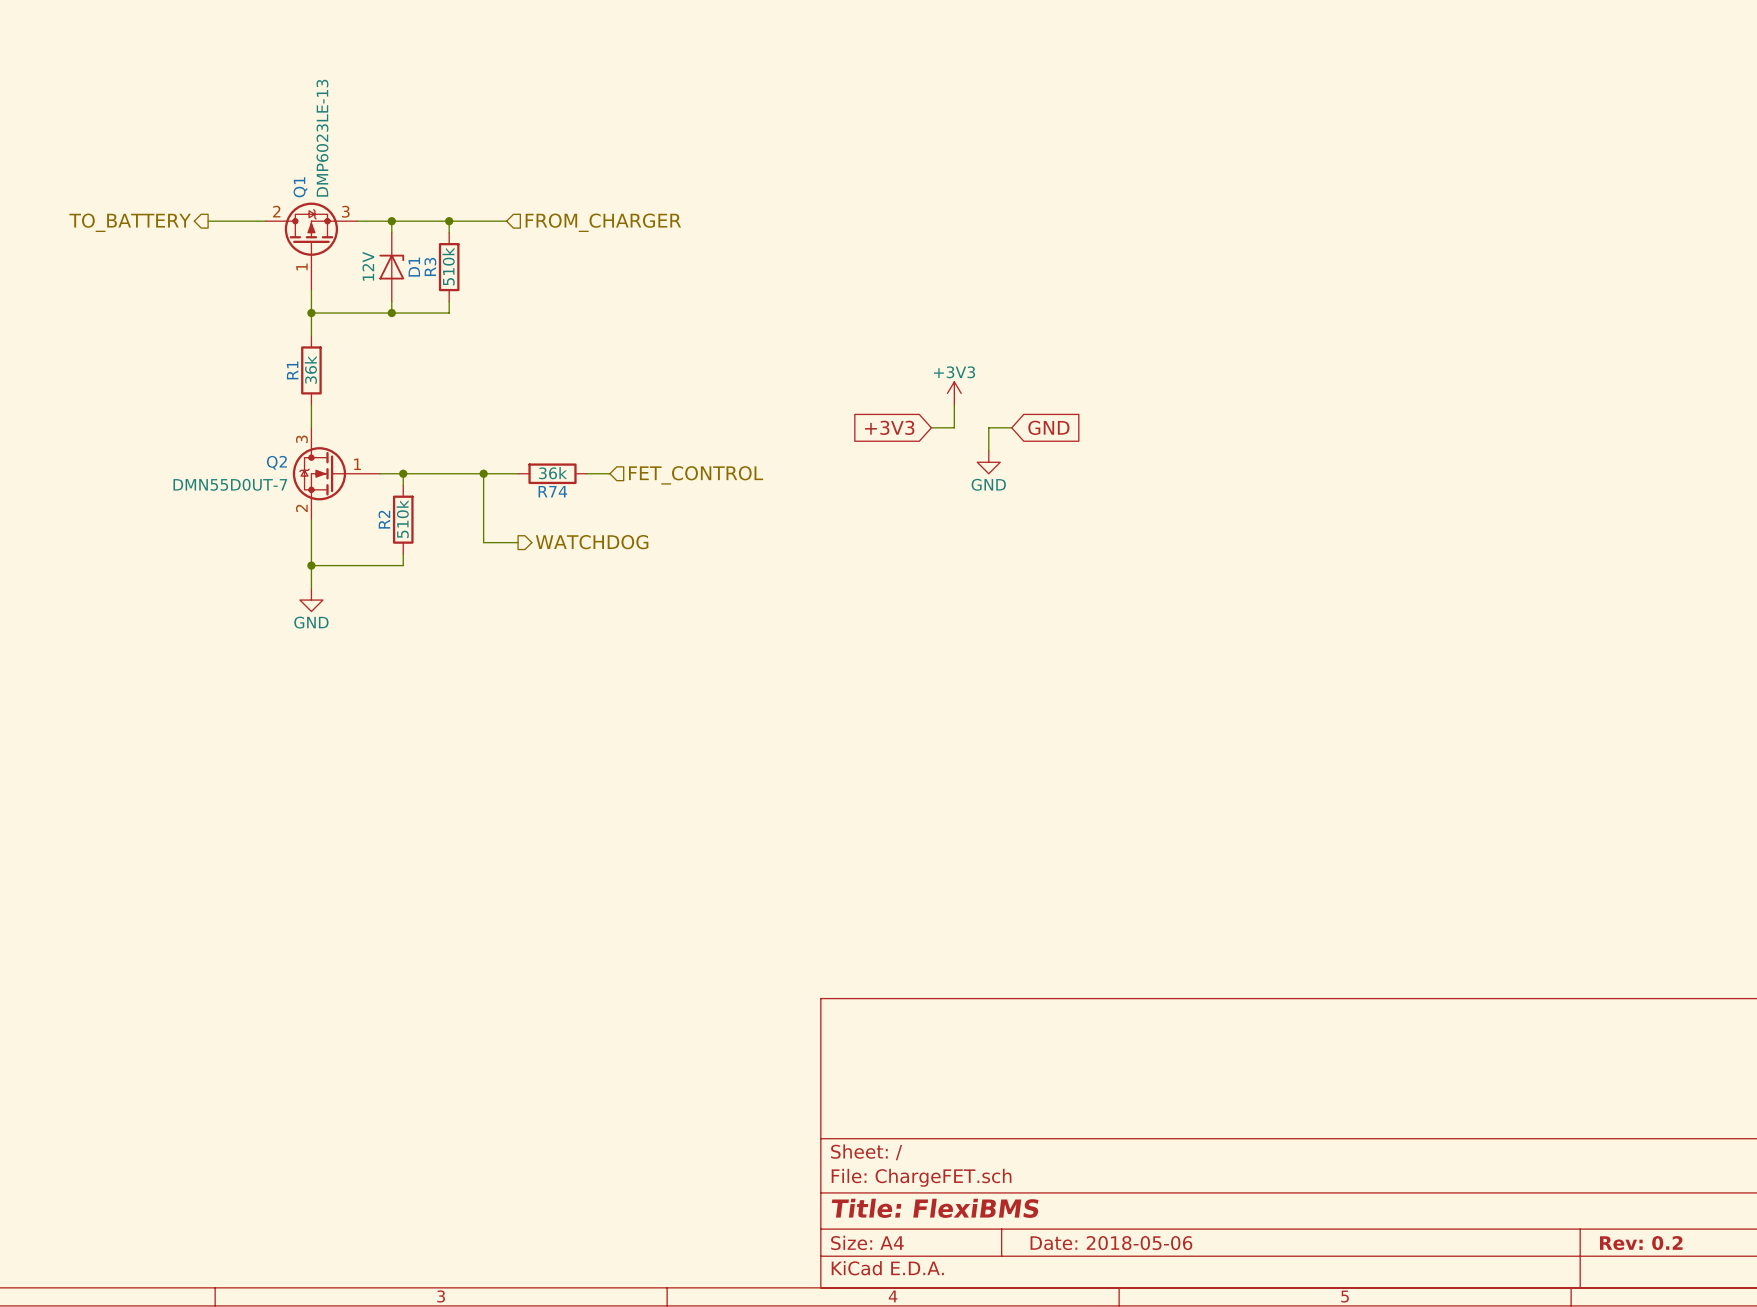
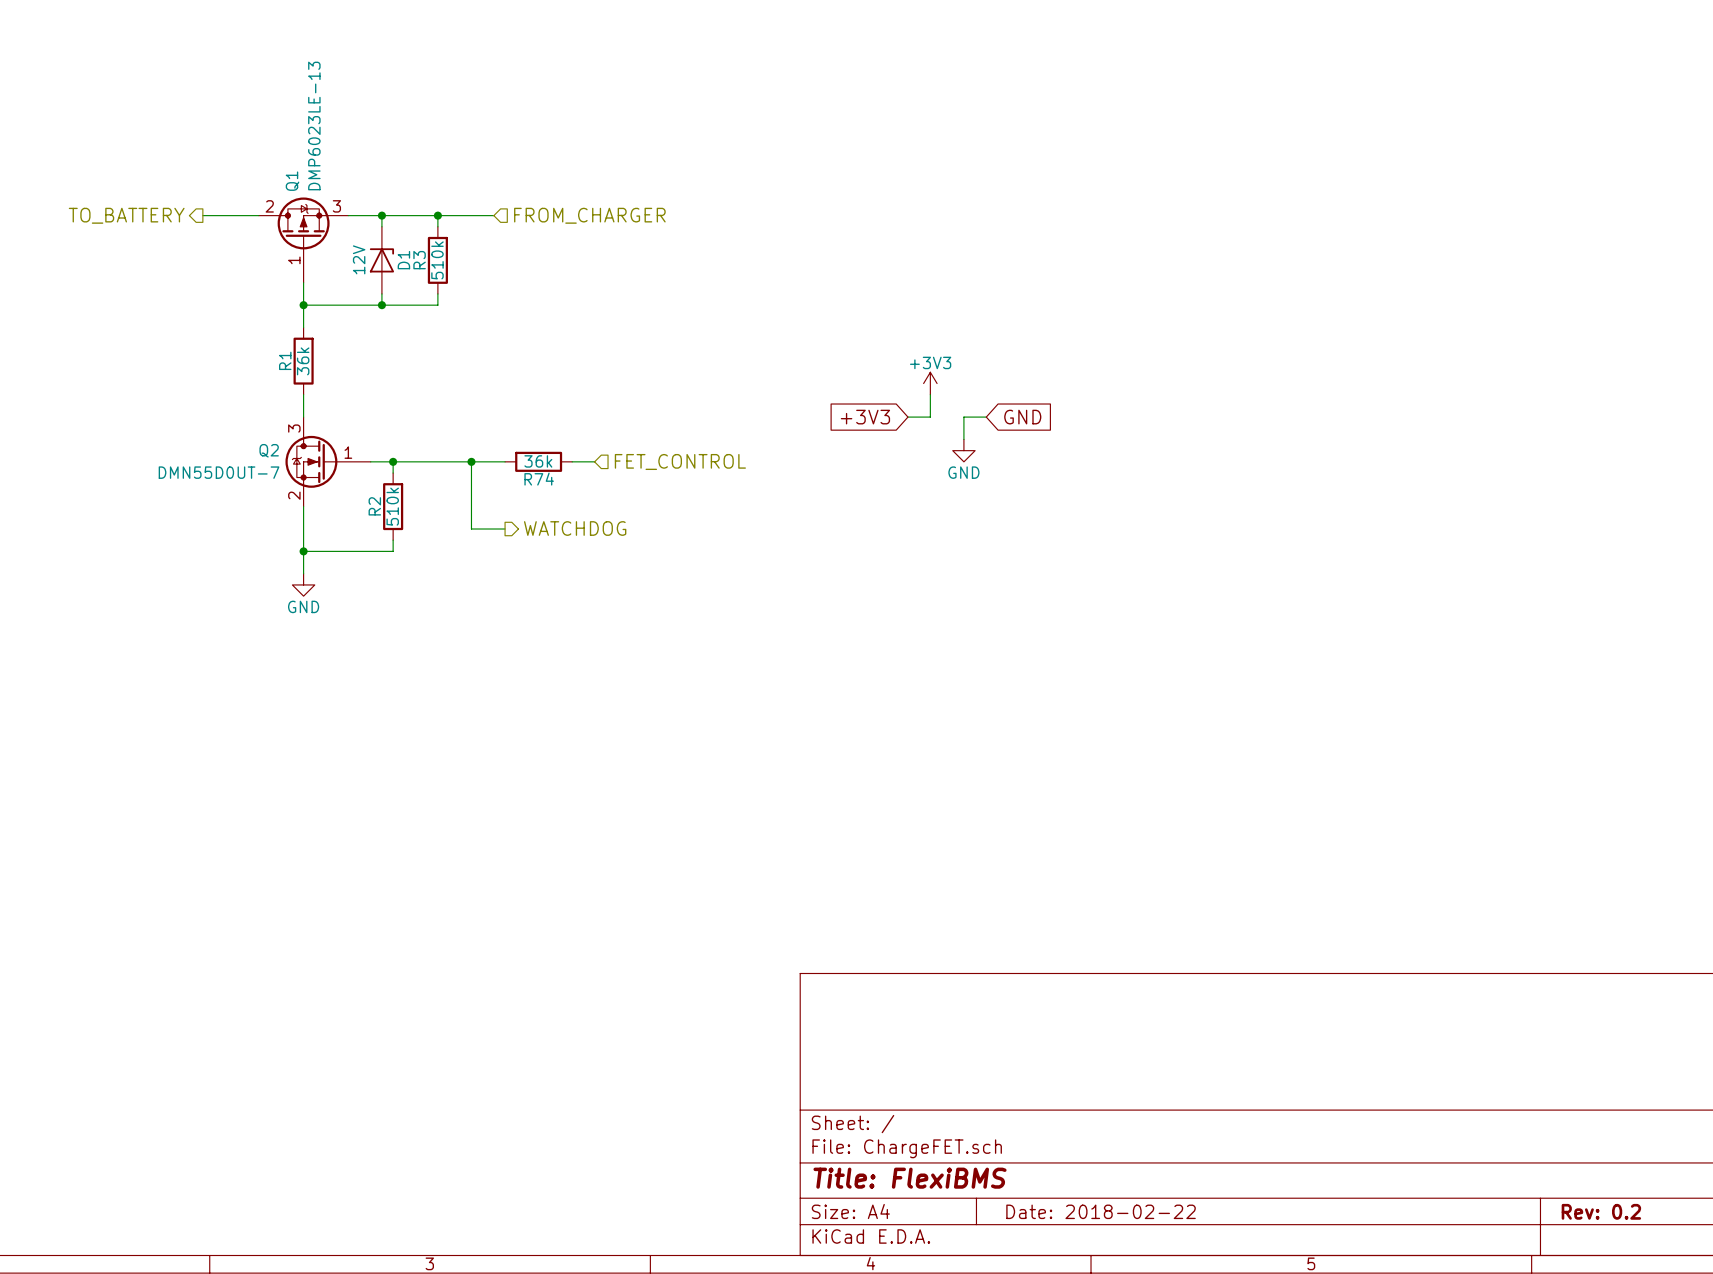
title block: Date: 2018-05-06 (1111, 1243) -> Date: 2018-02-22 (1101, 1211)

